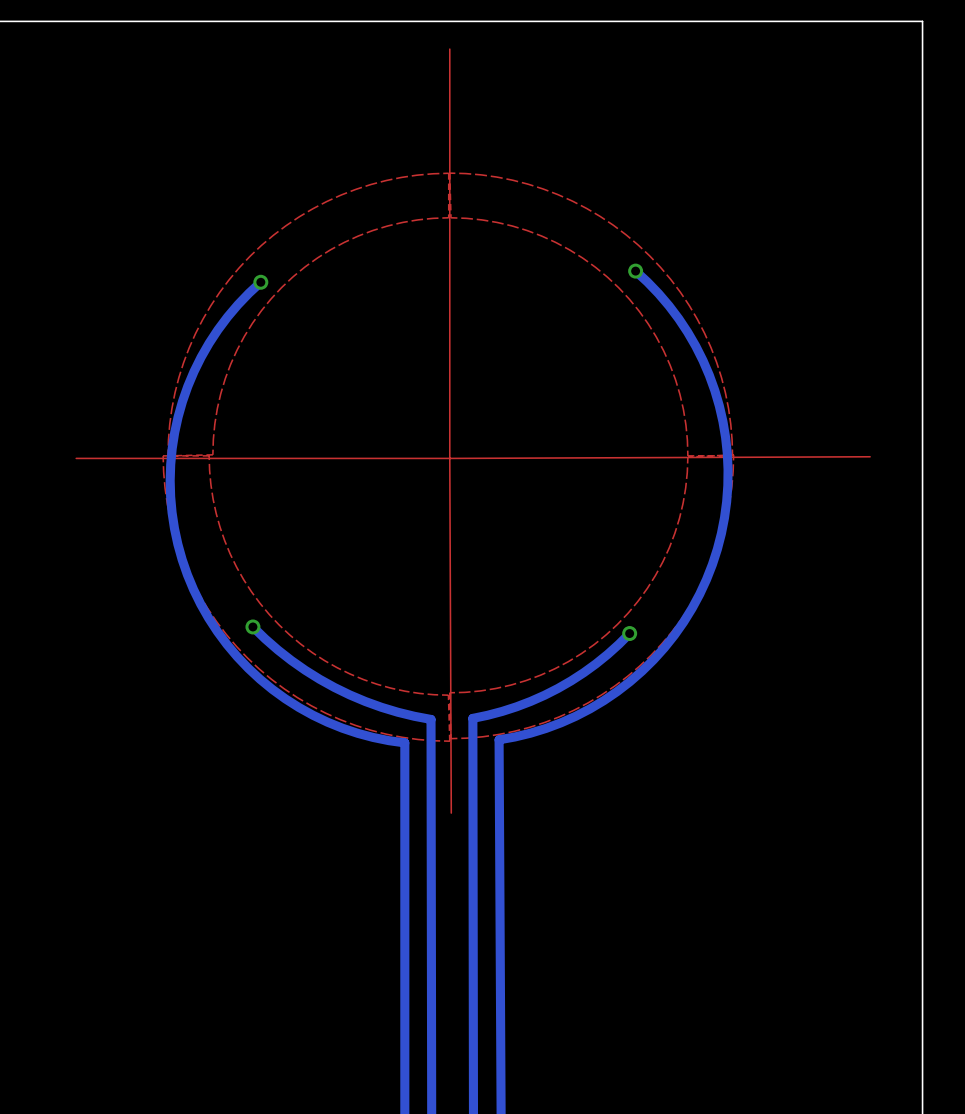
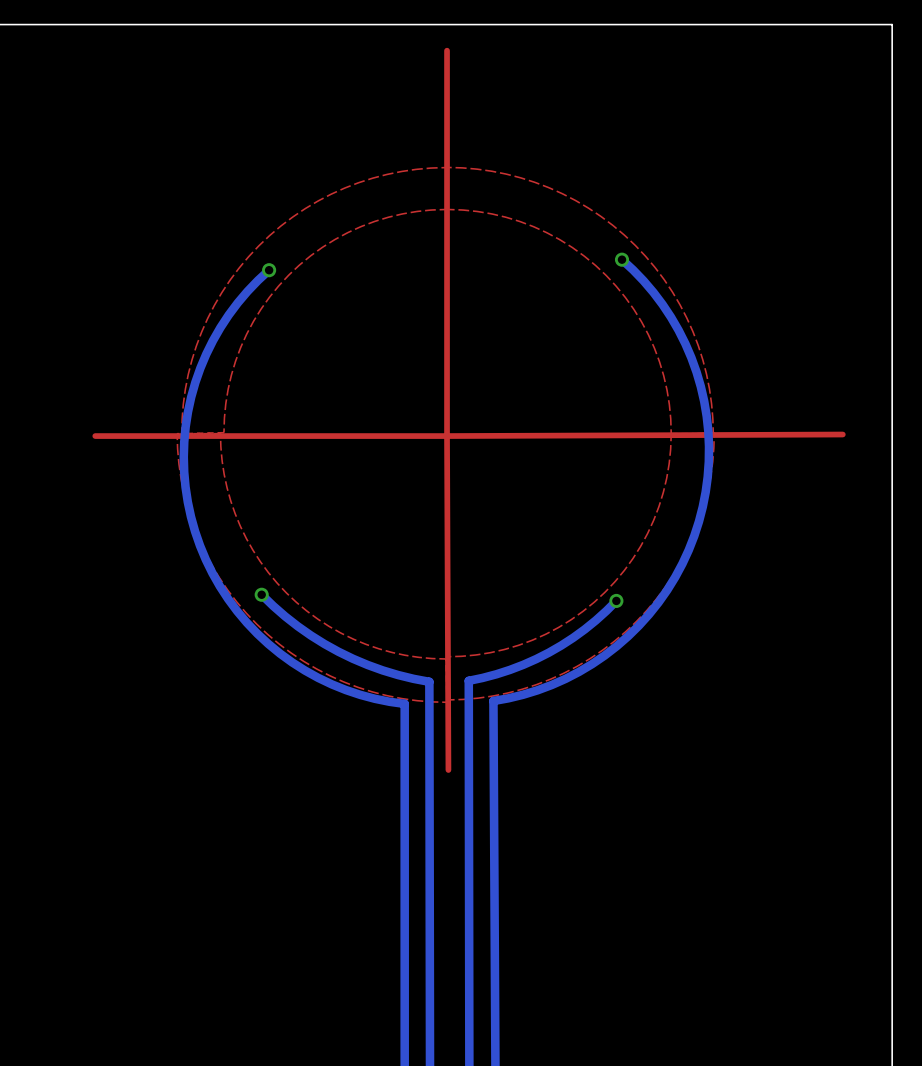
top track width: thin (449, 49) (449, 458) -> thick (447, 50) (447, 436)
top track width: thin (870, 456) (449, 458) -> thick (842, 434) (447, 436)
top track width: thin (449, 458) (76, 458) -> thick (447, 436) (95, 436)
top track width: thin (449, 458) (451, 813) -> thick (447, 436) (448, 770)

